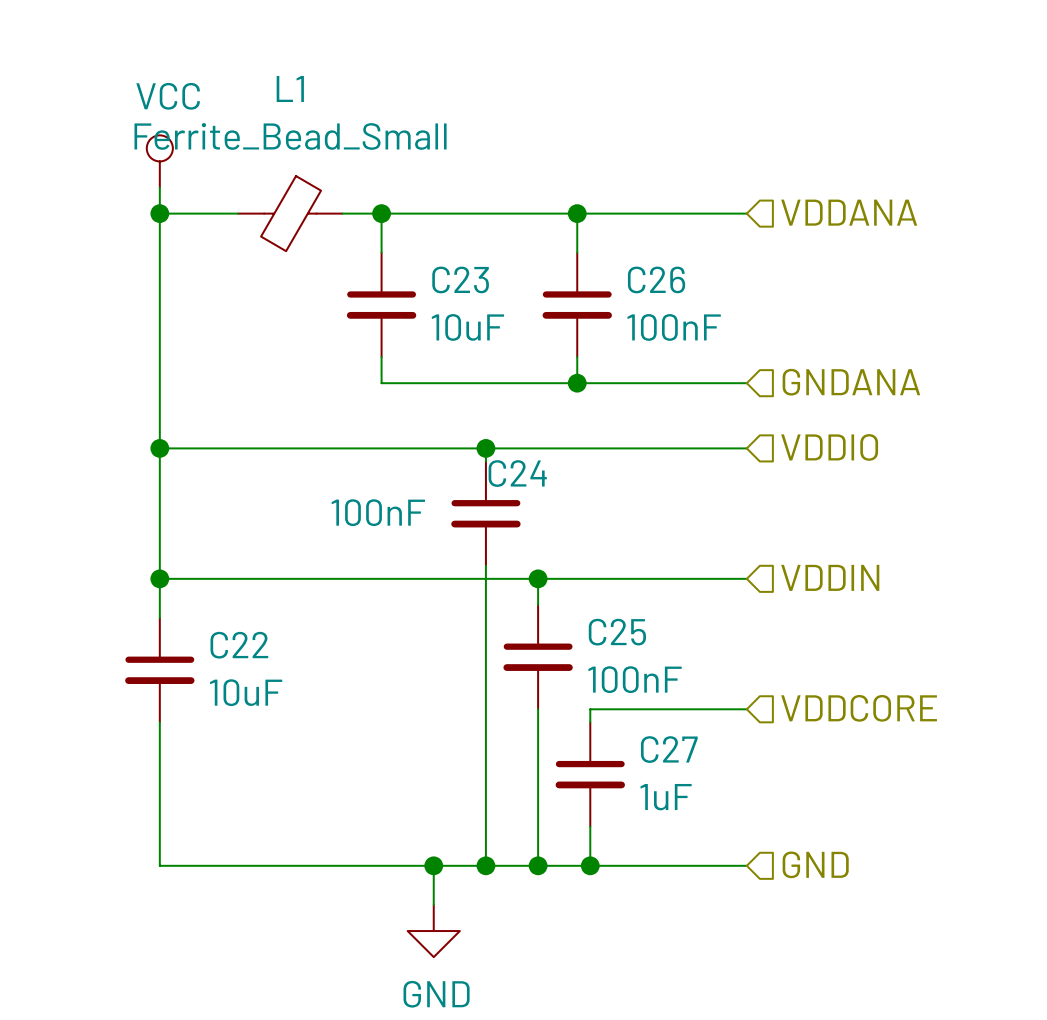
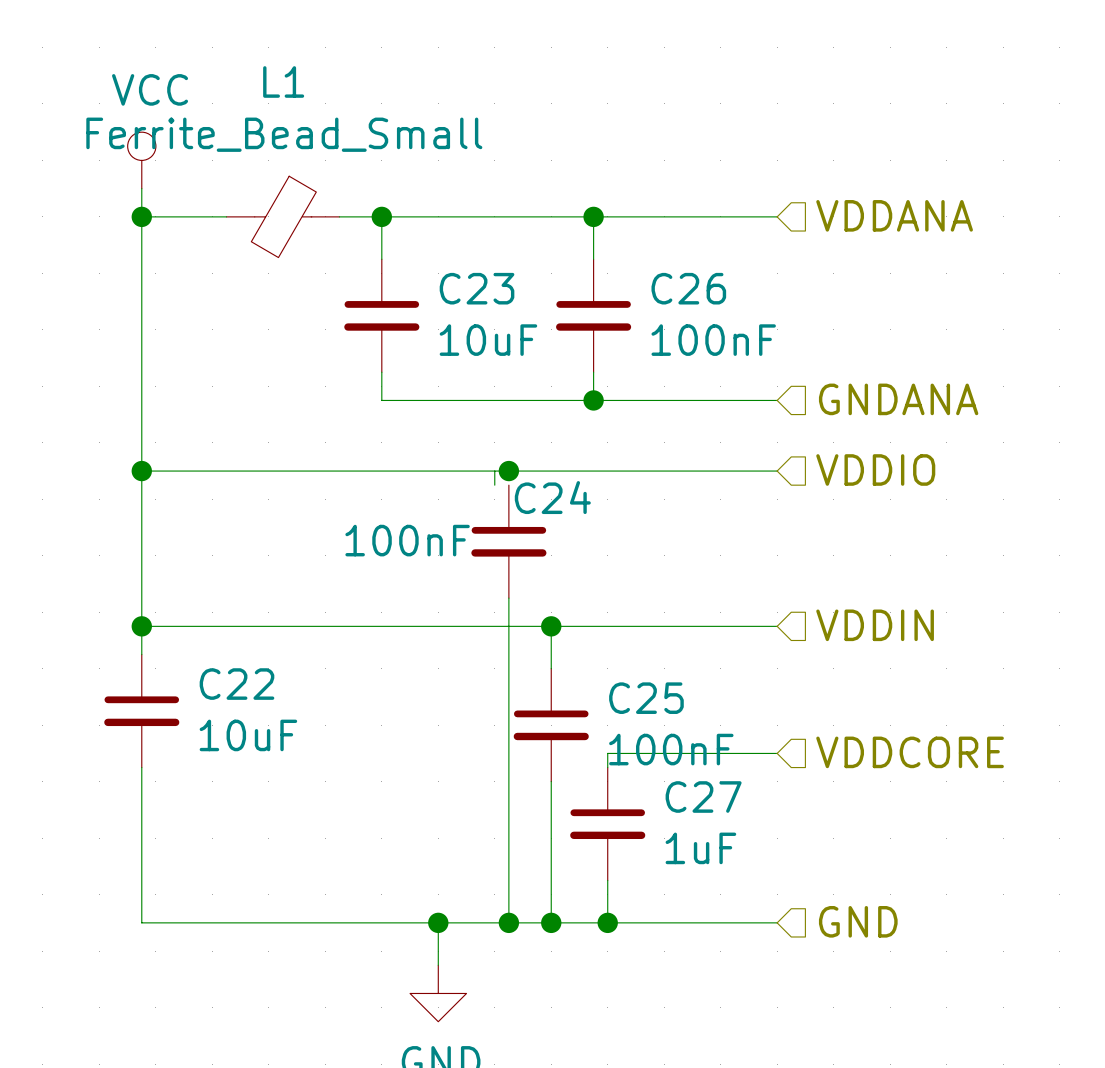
junction position: (485, 448) -> (508, 471)
C24 position: (485, 513) -> (508, 541)
wire: (485, 565) (485, 865) -> (508, 598) (508, 922)
hierarchical label position: VDDIN (830, 577) -> VDDIN (875, 625)
wire: (159, 578) (746, 578) -> (141, 626) (777, 626)
junction position: (159, 578) -> (141, 626)
junction position: (538, 578) -> (551, 626)
C25 position: (538, 657) -> (551, 725)
junction position: (485, 865) -> (508, 922)

